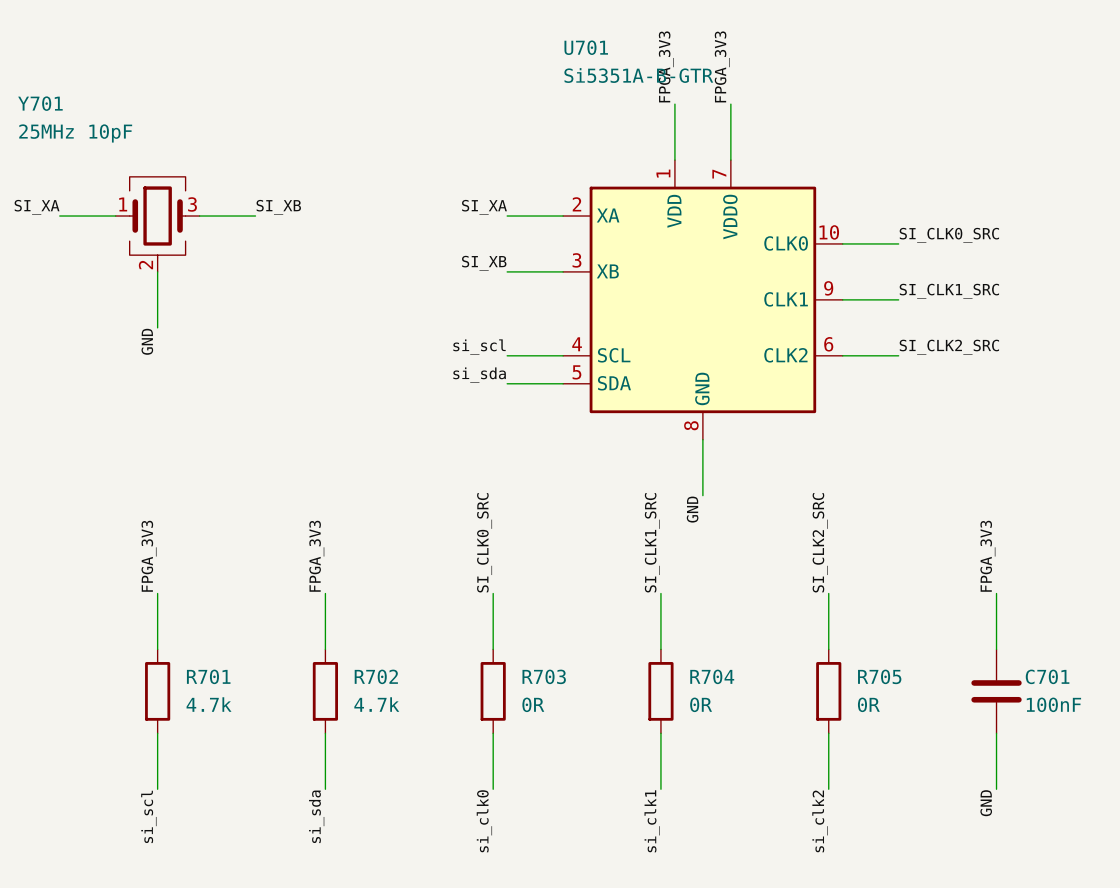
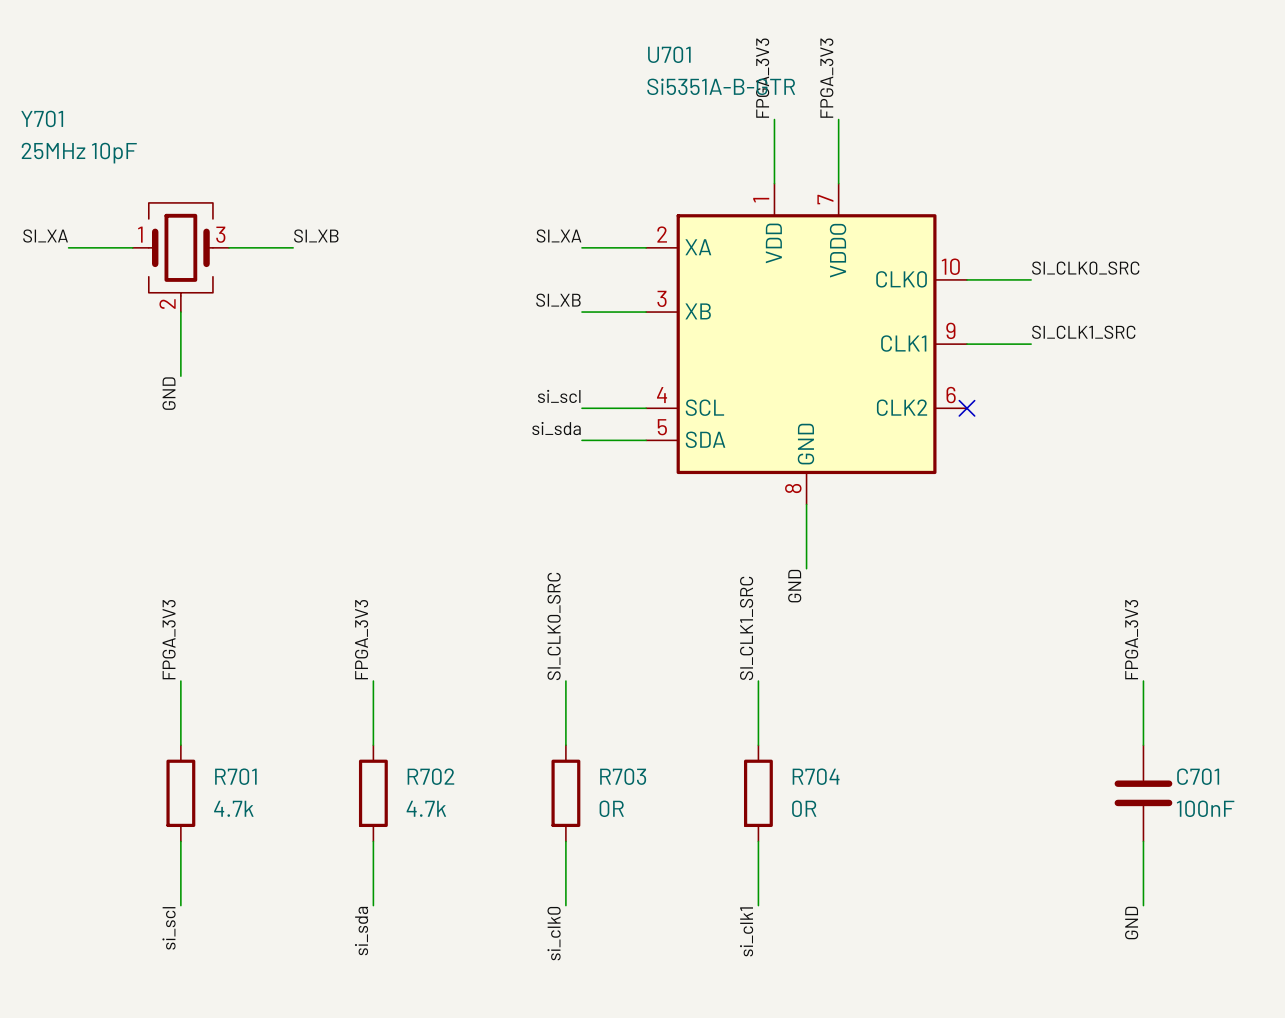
label: SI_CLK2_SRC (949, 347) -> none
wire: (842, 355) (898, 355) -> none
no-connect mark: none -> (966, 408)
label: SI_CLK2_SRC (820, 542) -> none
wire: (828, 593) (828, 649) -> none
R705: 0R (828, 691) -> none
wire: (828, 733) (828, 789) -> none
label: si_clk2 (819, 821) -> none

